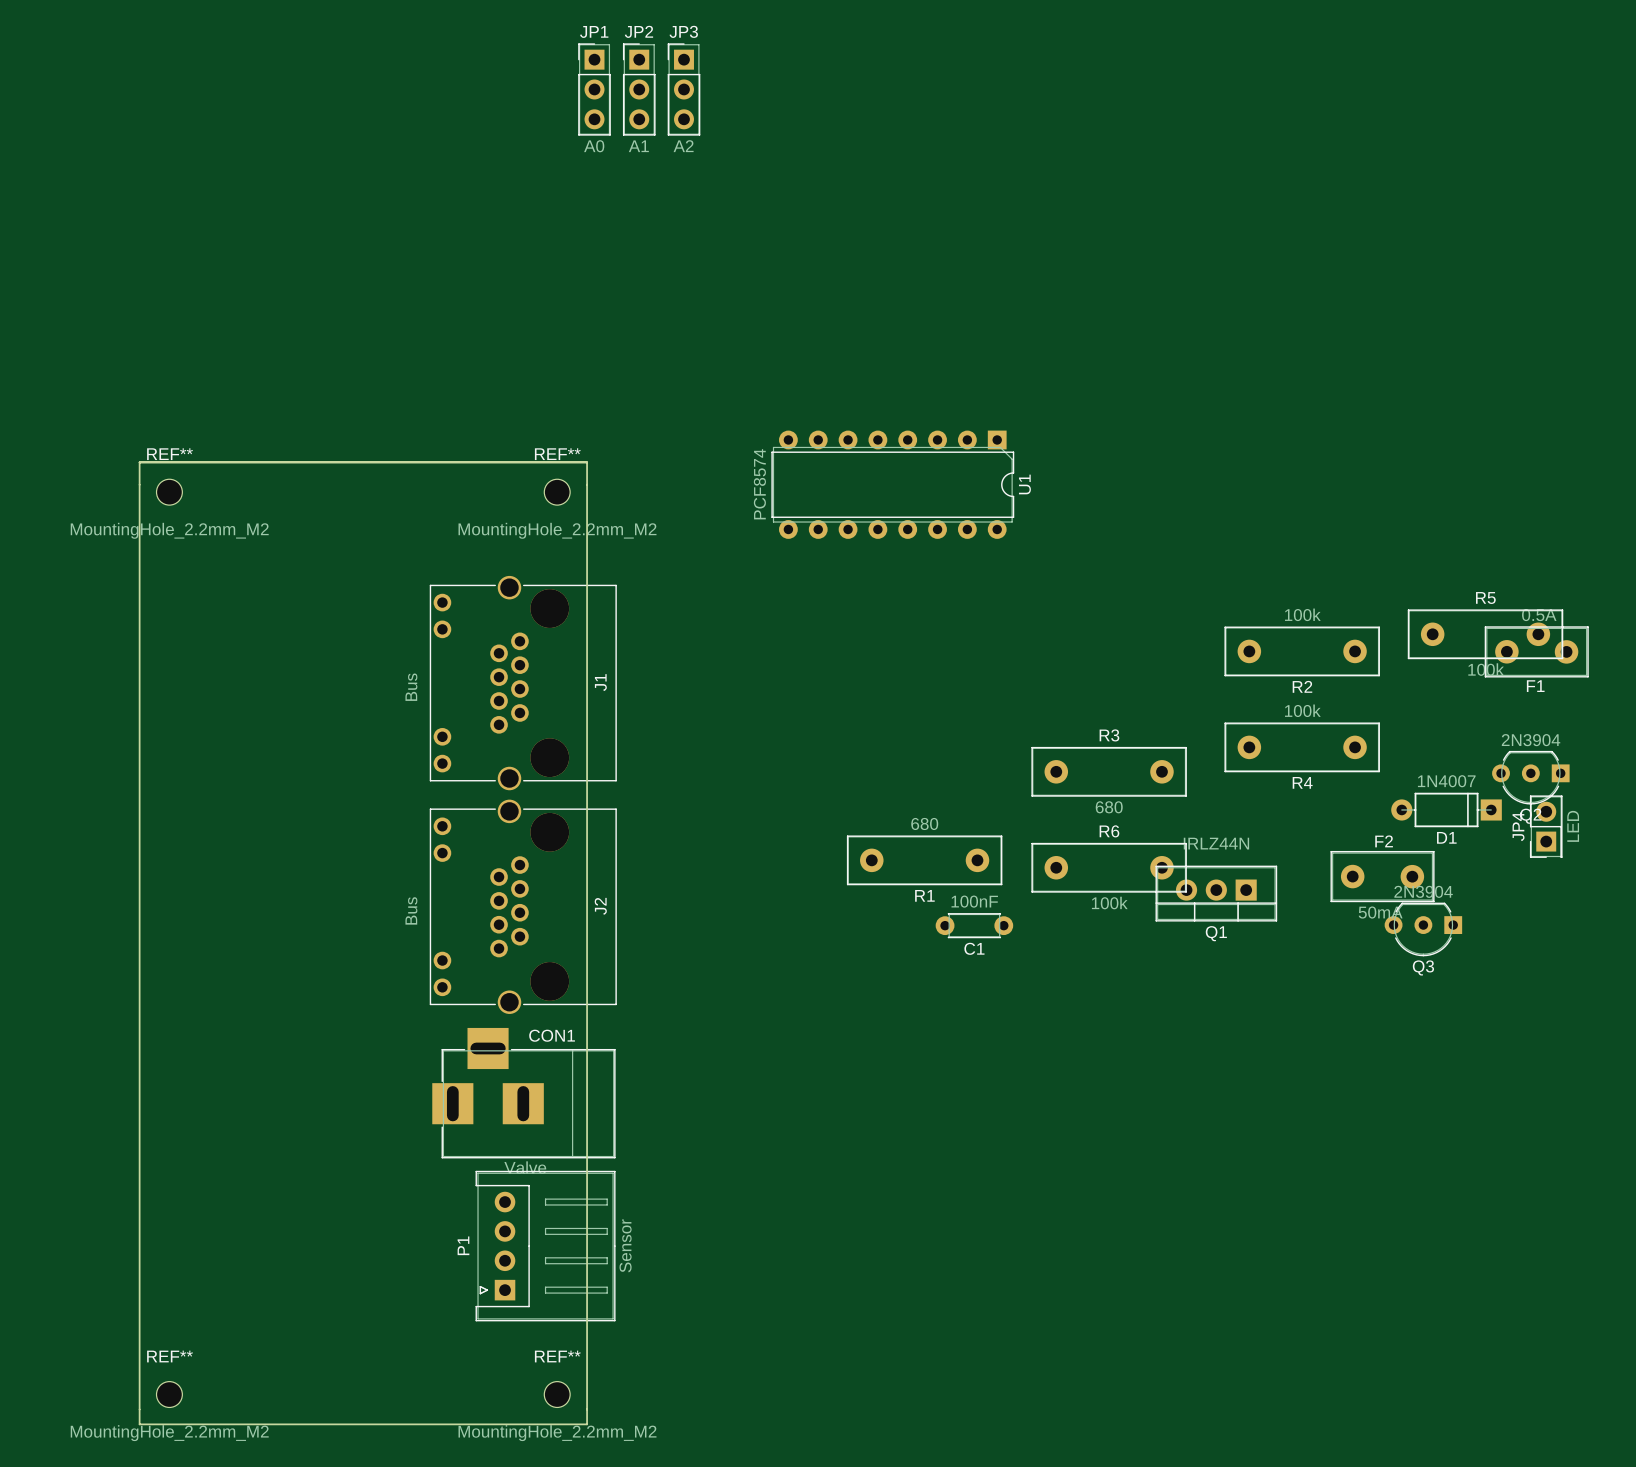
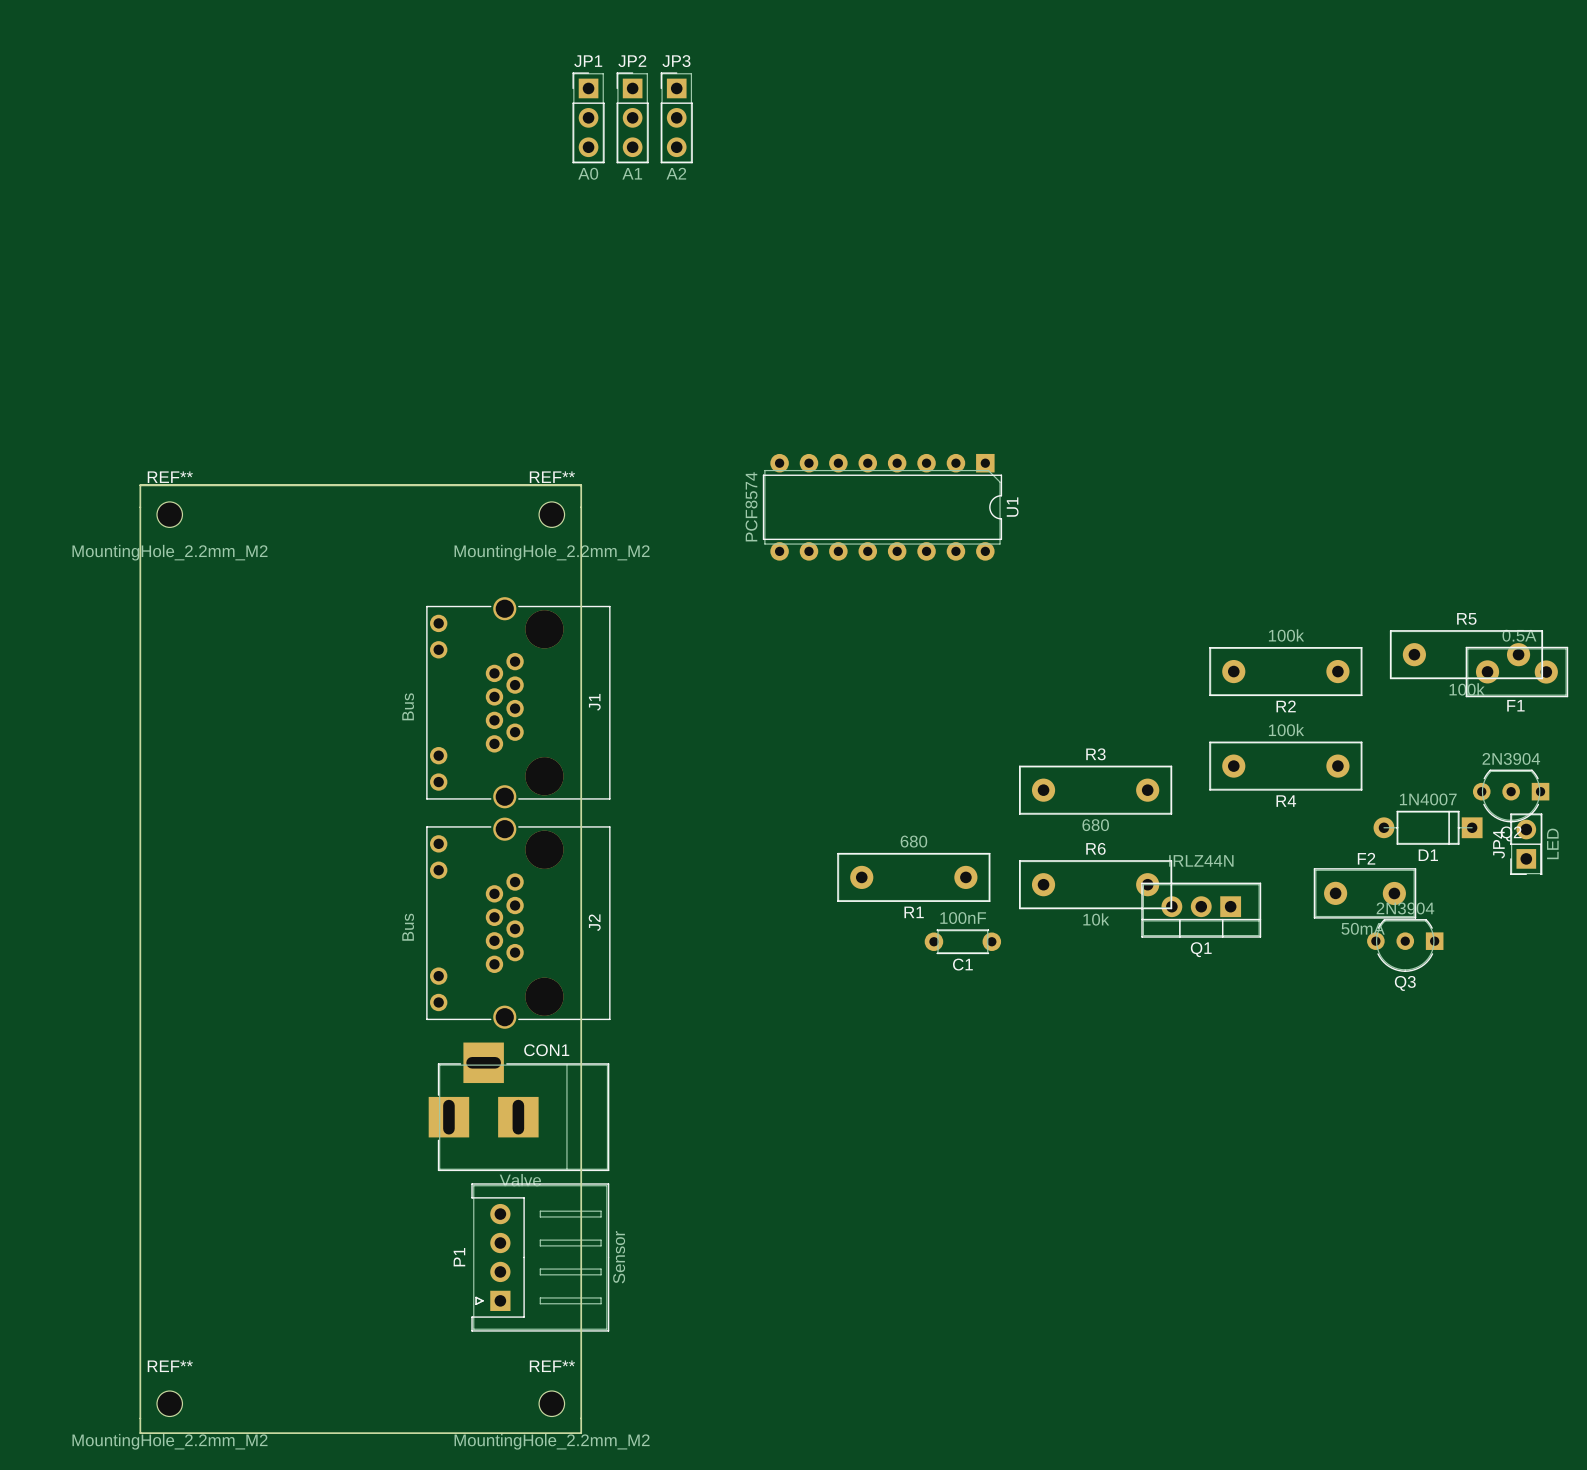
R6 value: 100k (1109, 903) -> 10k (1096, 919)

